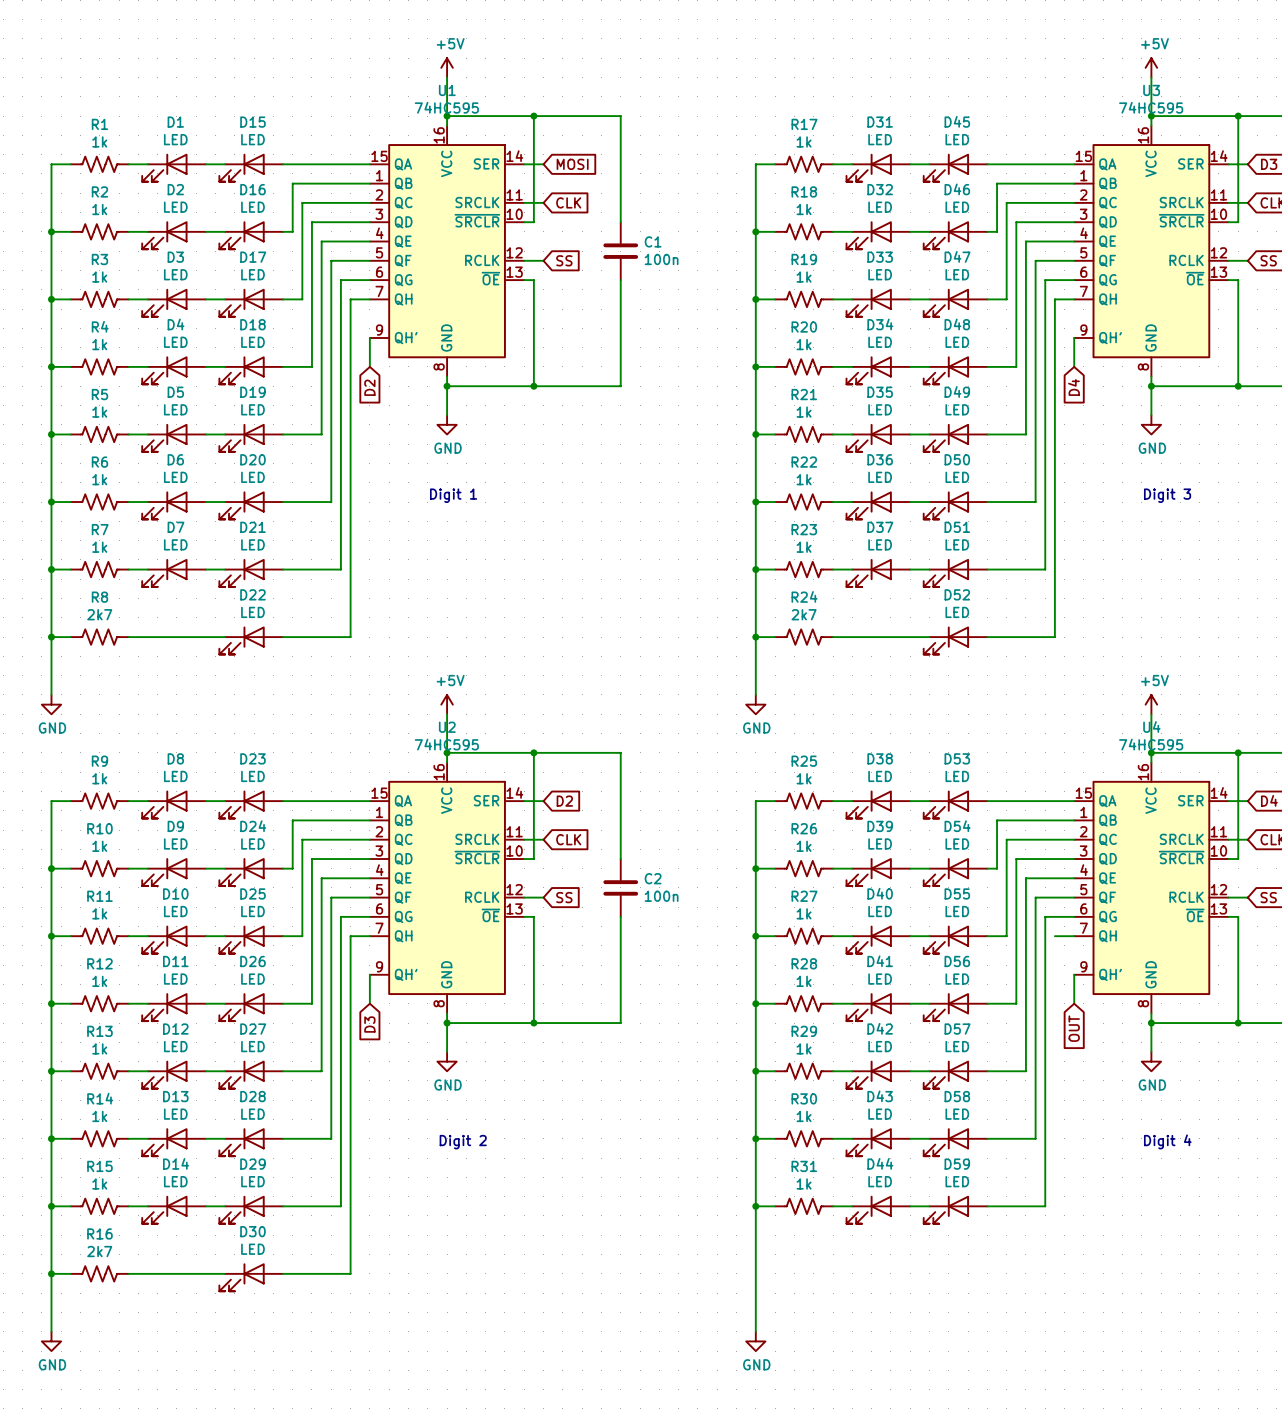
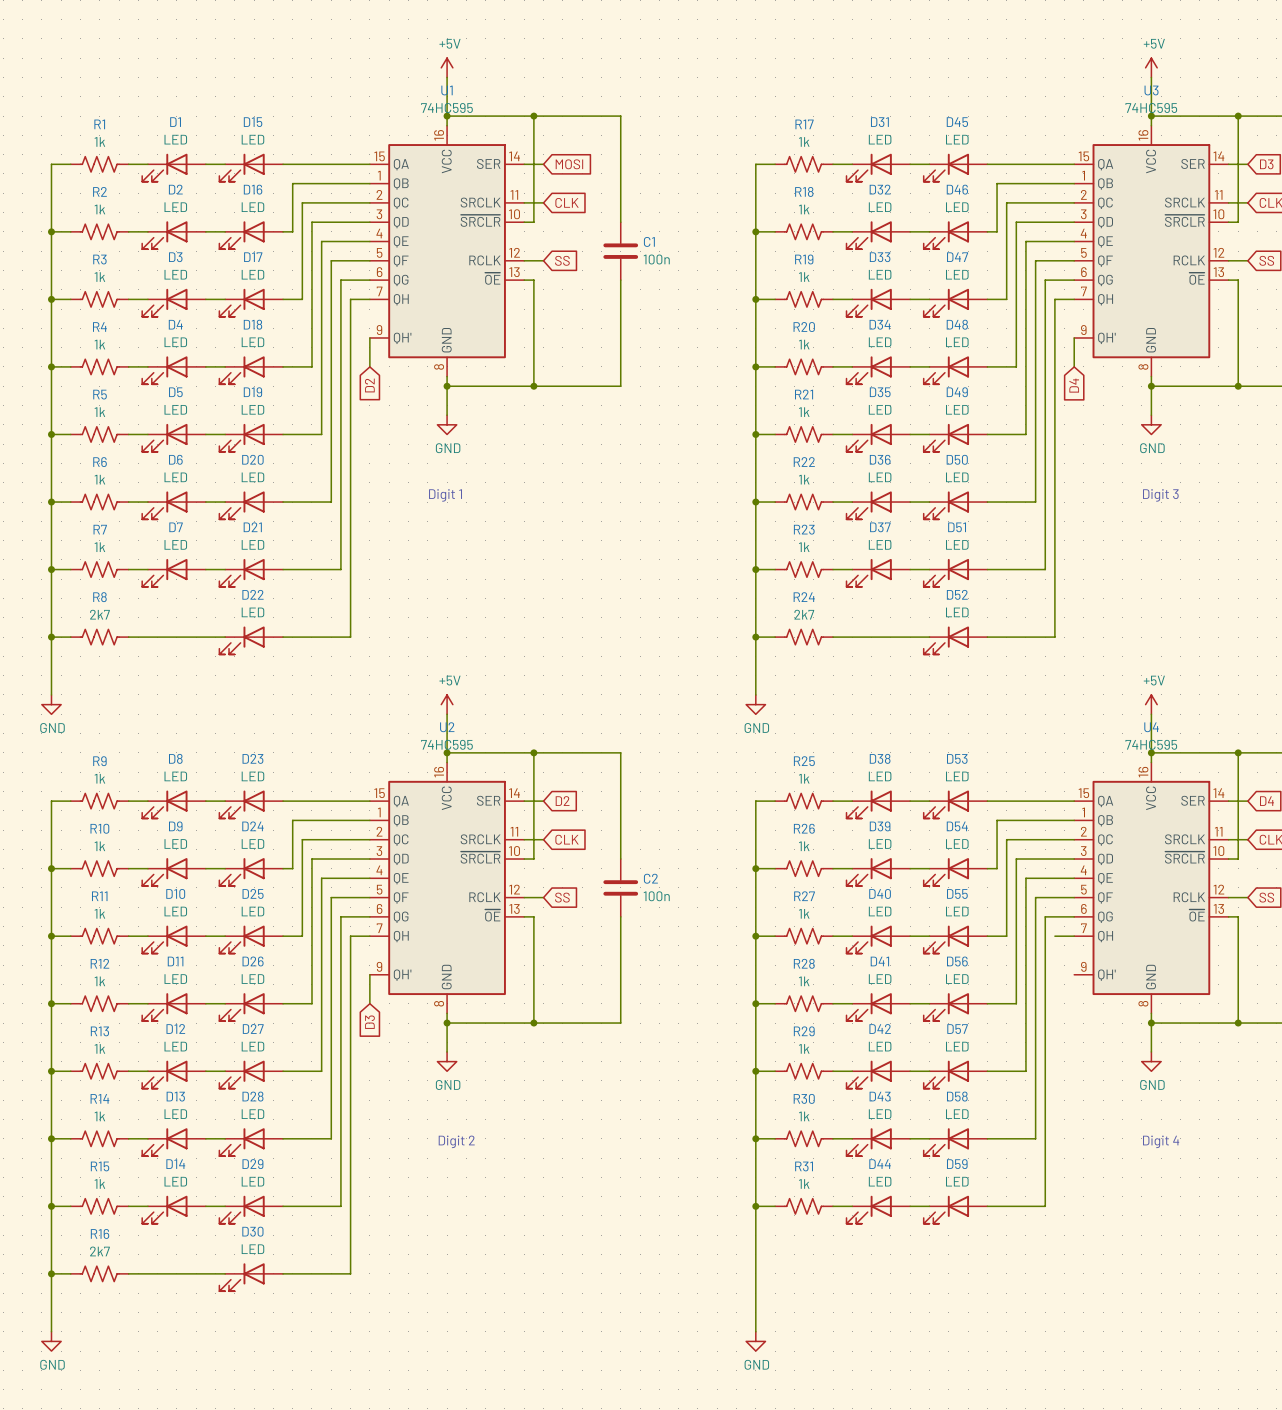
wire: (1074, 974) (1074, 1003) -> none
global label: OUT (1074, 1028) -> none

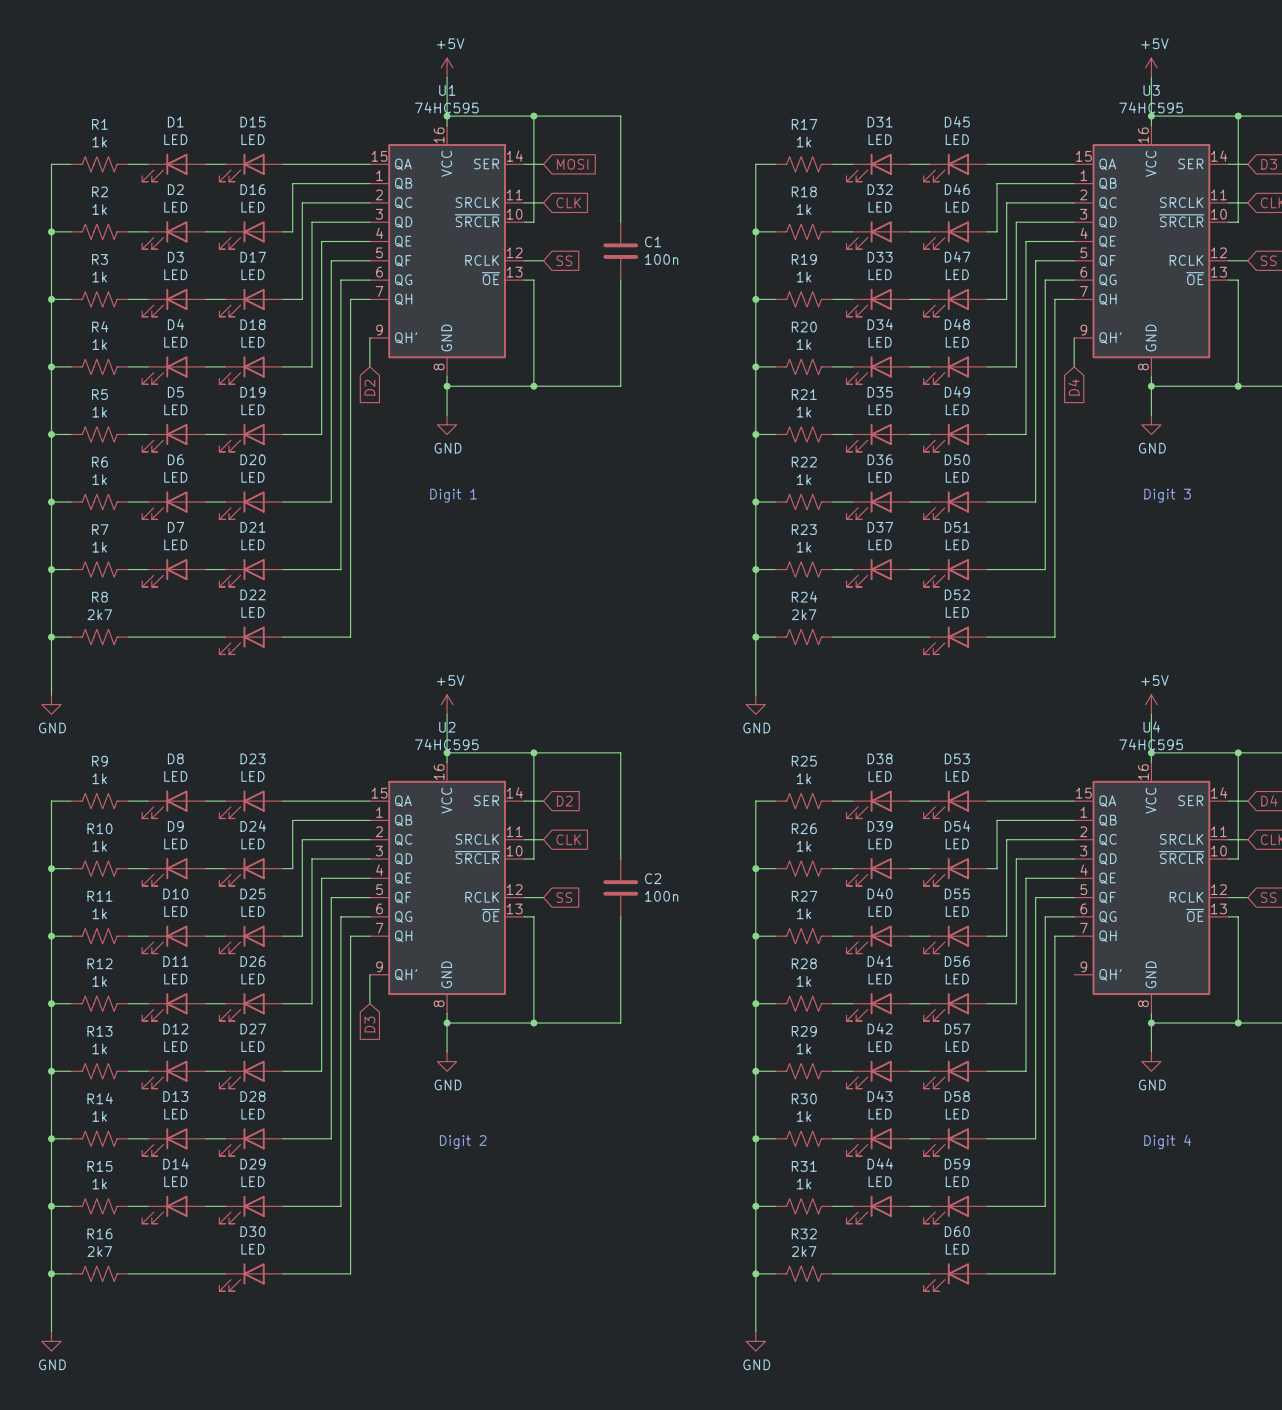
wire: none -> (1054, 936) (1054, 1273) (987, 1273)
wire: none -> (755, 1273) (775, 1273)
junction: none -> (755, 1273)
R32: none -> 2k7 (804, 1273)
wire: none -> (833, 1273) (929, 1273)
D60: none -> LED (955, 1277)

